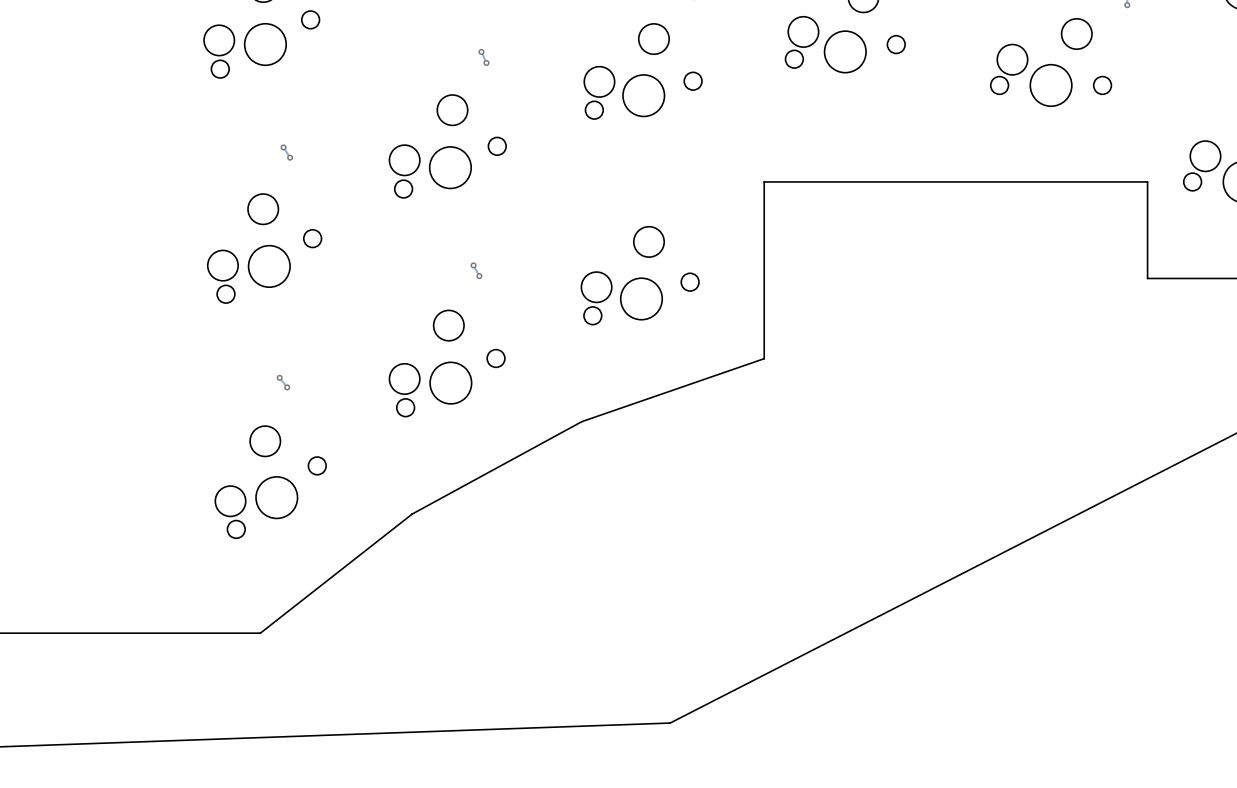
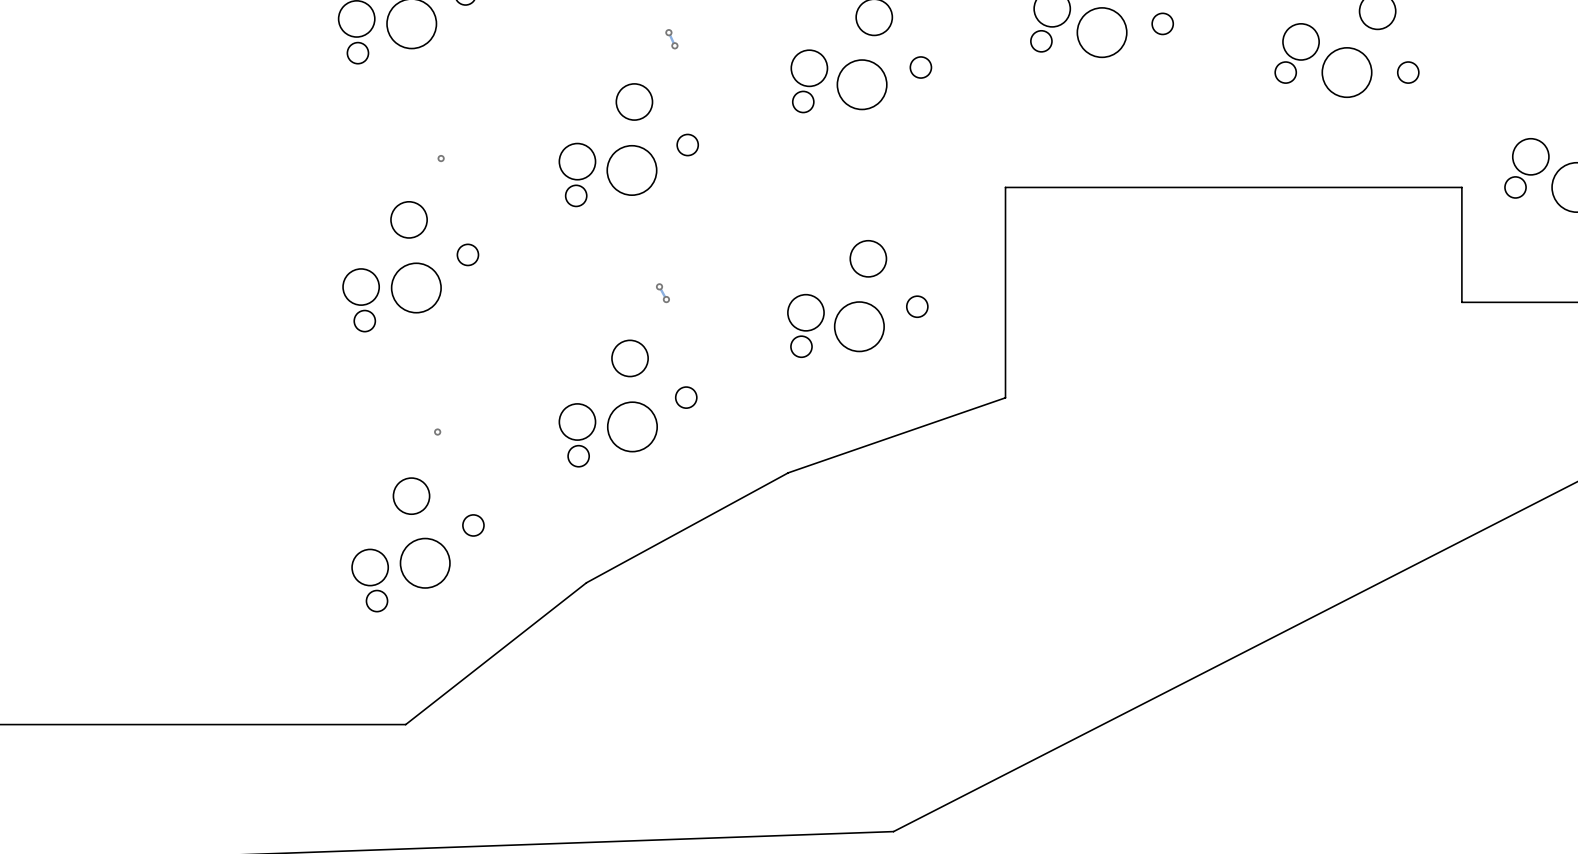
track: (283, 147) (290, 157) -> none
via: (283, 147) -> none
track: (279, 377) (287, 387) -> none
via: (279, 377) -> none

